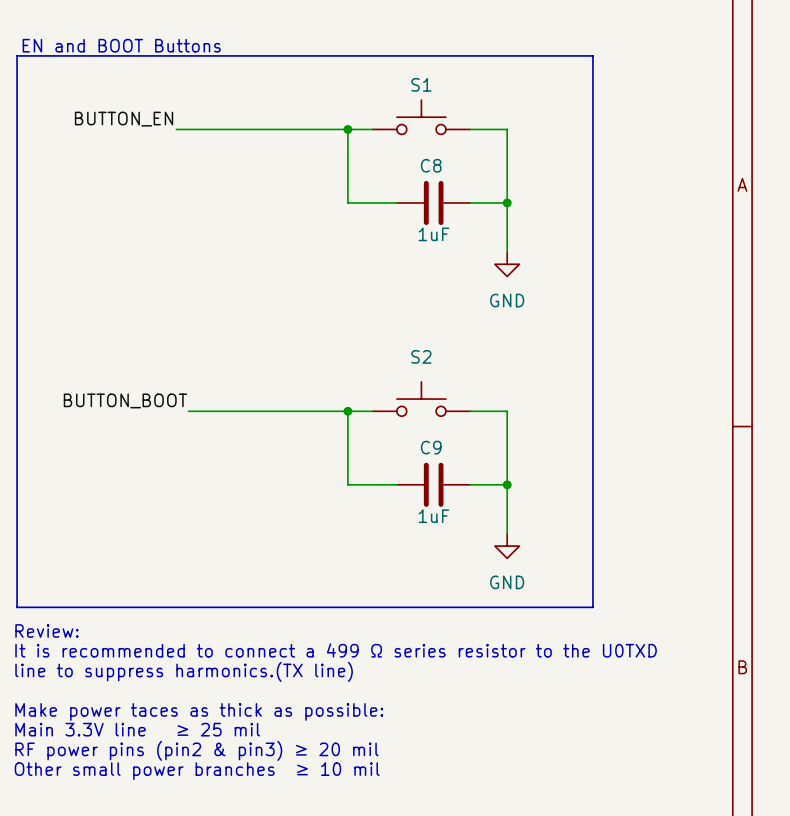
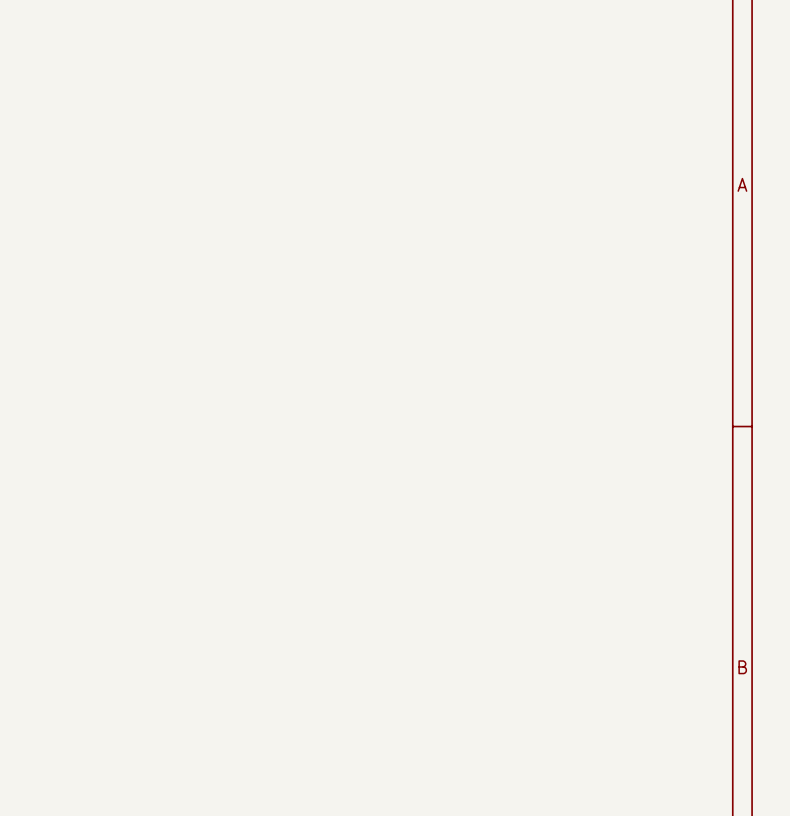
text: EN and BOOT Buttons (121, 45) -> none
line: (17, 55) (592, 55) (592, 607) (17, 607) (17, 55) -> none
S1: (421, 117) -> none
label: BUTTON_EN (124, 119) -> none
wire: (176, 129) (372, 129) -> none
wire: (347, 129) (347, 202) (396, 202) -> none
junction: (347, 129) -> none
wire: (470, 129) (507, 129) (507, 251) -> none
C8: 1uF (433, 202) -> none
wire: (470, 202) (507, 202) -> none
junction: (507, 202) -> none
power symbol: GND (507, 264) -> none
S2: (421, 399) -> none
label: BUTTON_BOOT (125, 400) -> none
wire: (188, 411) (372, 411) -> none
wire: (347, 411) (347, 484) (396, 484) -> none
junction: (347, 411) -> none
wire: (470, 411) (507, 411) (507, 533) -> none
C9: 1uF (433, 484) -> none
wire: (470, 484) (507, 484) -> none
junction: (507, 484) -> none
power symbol: GND (507, 546) -> none
text: Review: (46, 631) -> none
text: It is recommended to connect a 499 Ω series resistor to the U0TXD (336, 650) -> none
text: line to suppress harmonics.(TX line) (184, 671) -> none
text: Make power taces as thick as possible: (199, 711) -> none
text: Main 3.3V line ≥ 25 mil (137, 729) -> none
text: RF power pins (pin2 & pin3) ≥ 20 mil (196, 750) -> none
text: Other small power branches ≥ 10 mil (197, 771) -> none

